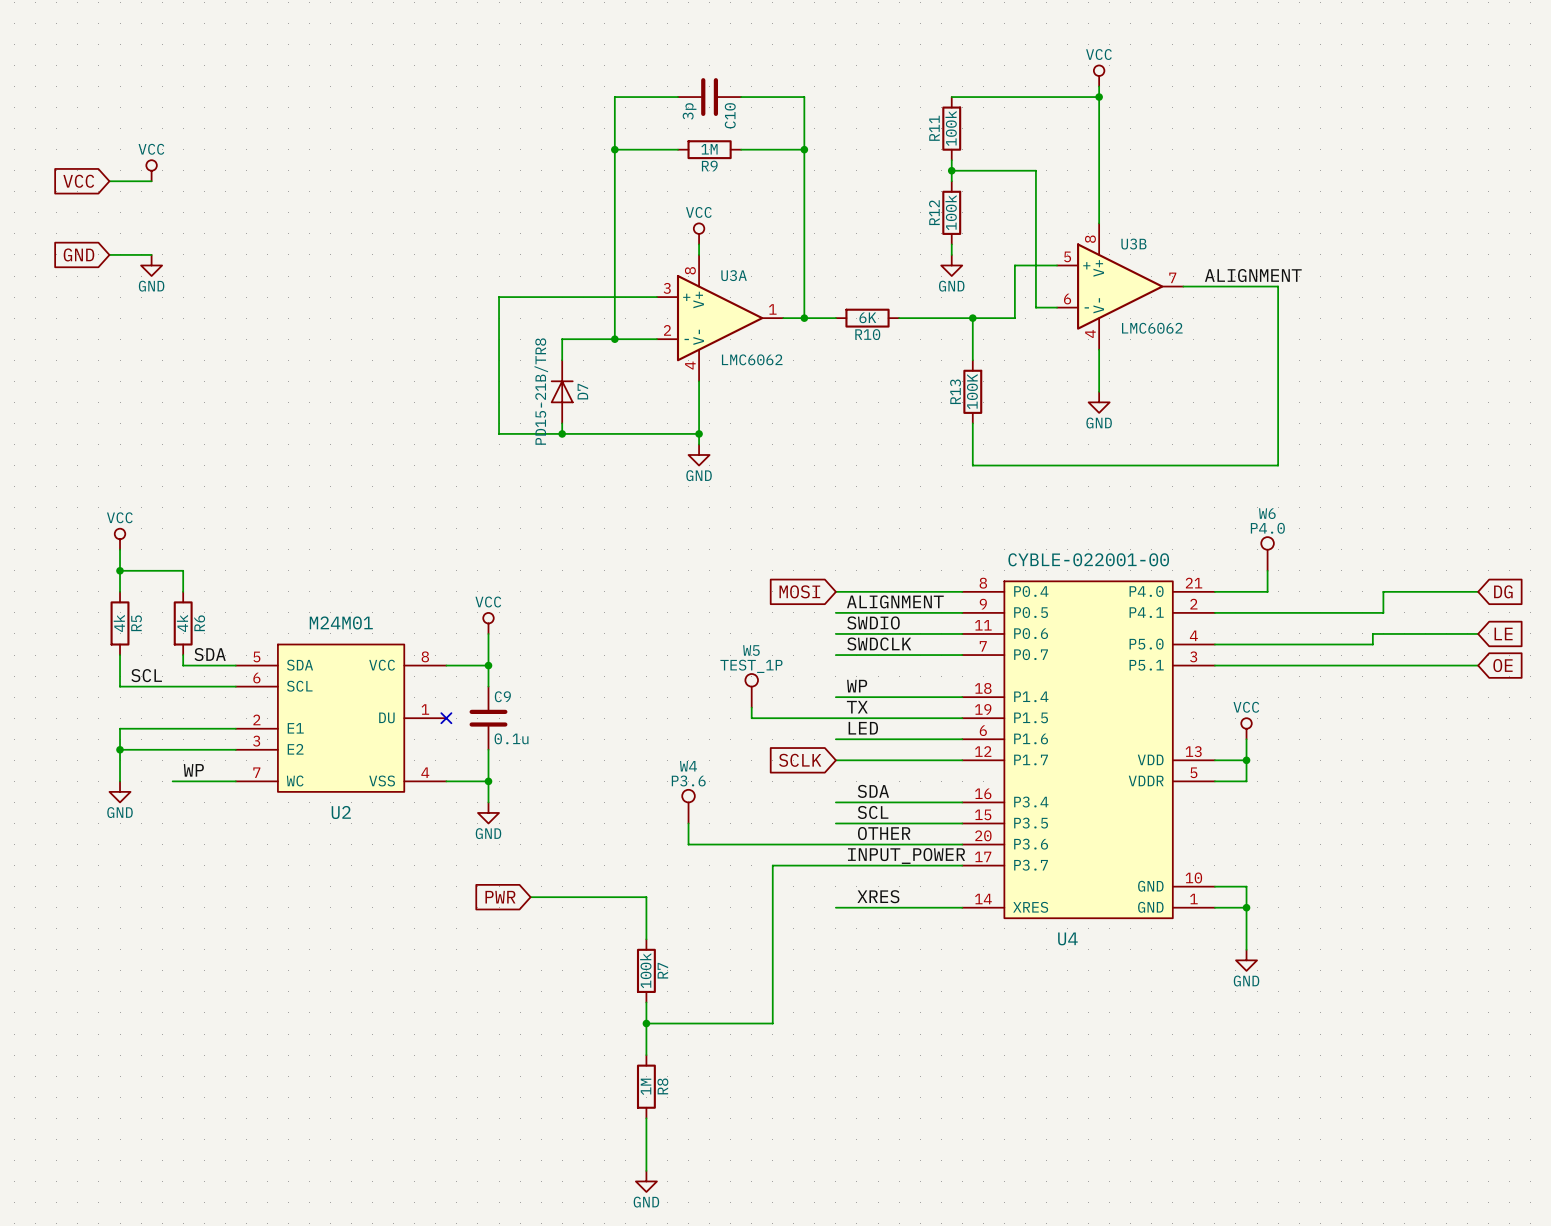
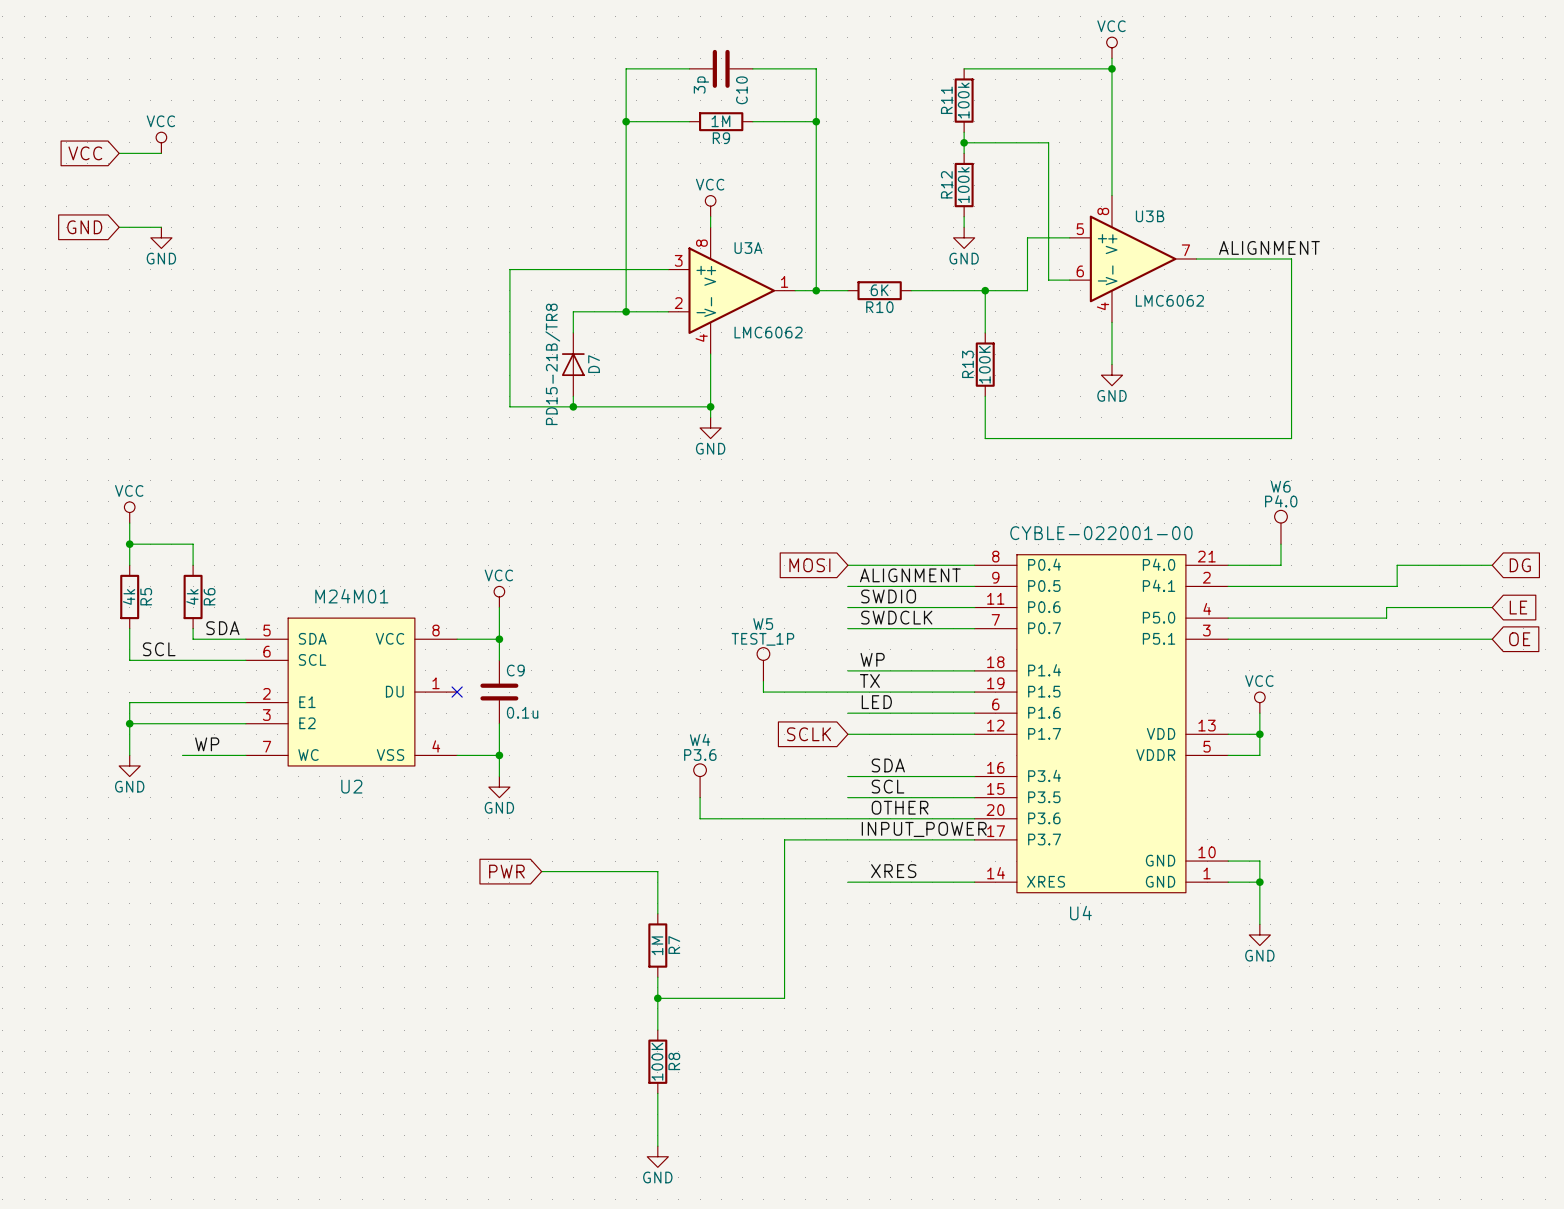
R7 value: 100k (645, 970) -> 1M (657, 945)
R8 value: 1M (646, 1086) -> 100K (657, 1061)

